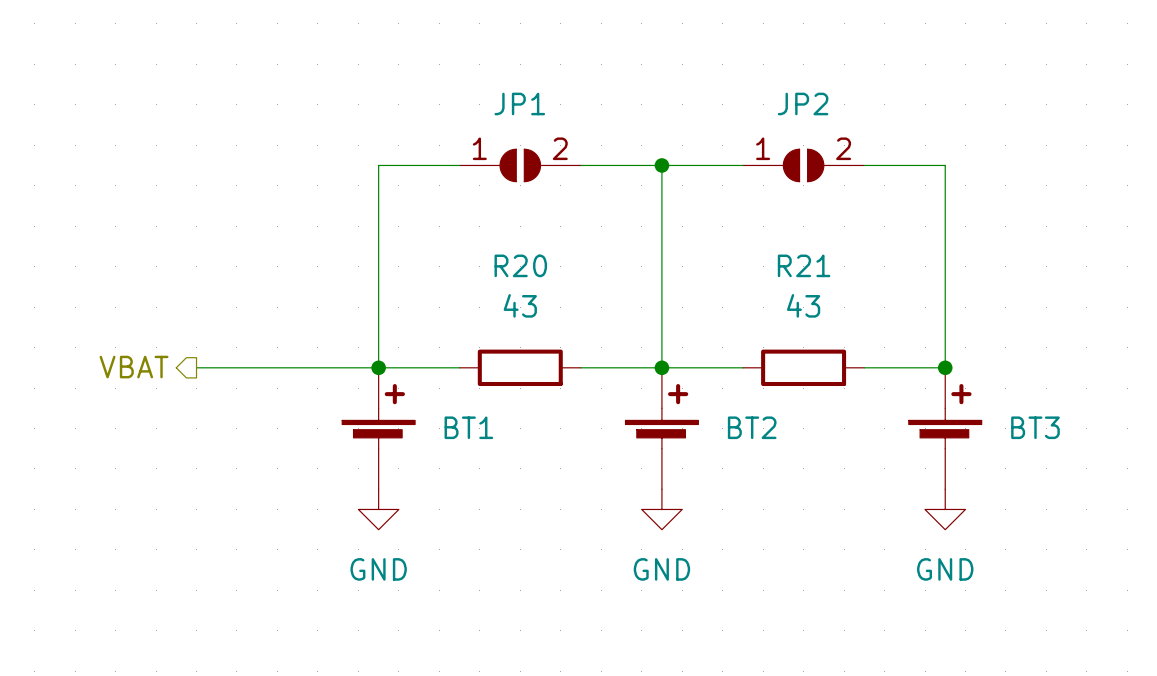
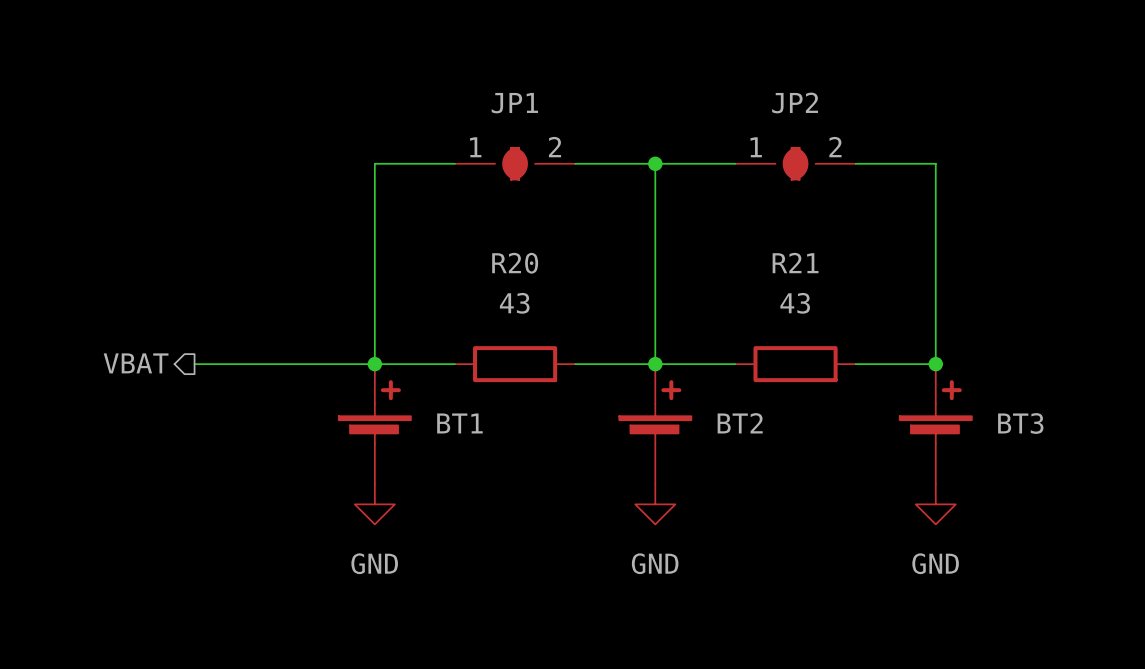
JP1 symbol: [459, 149, 581, 182] -> [454, 147, 576, 180]
JP2 symbol: [742, 149, 865, 182] -> [735, 147, 856, 180]

